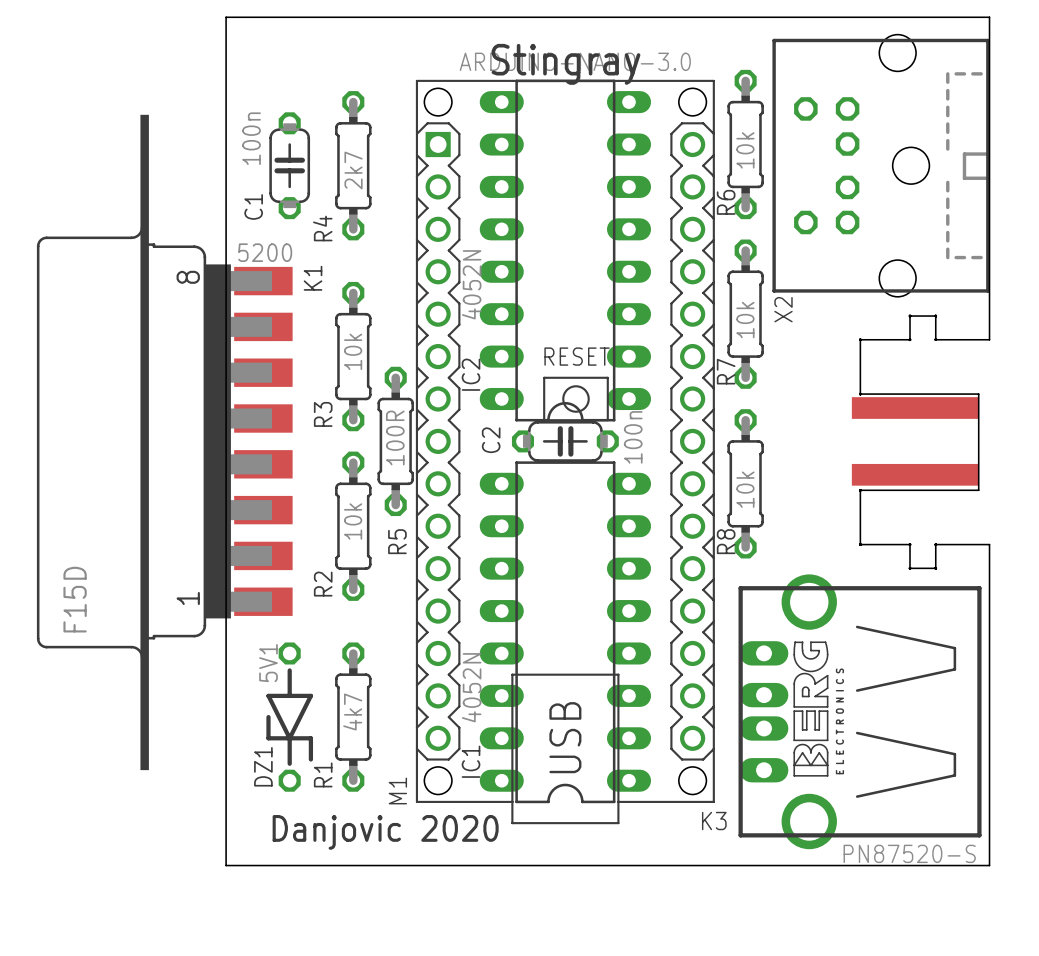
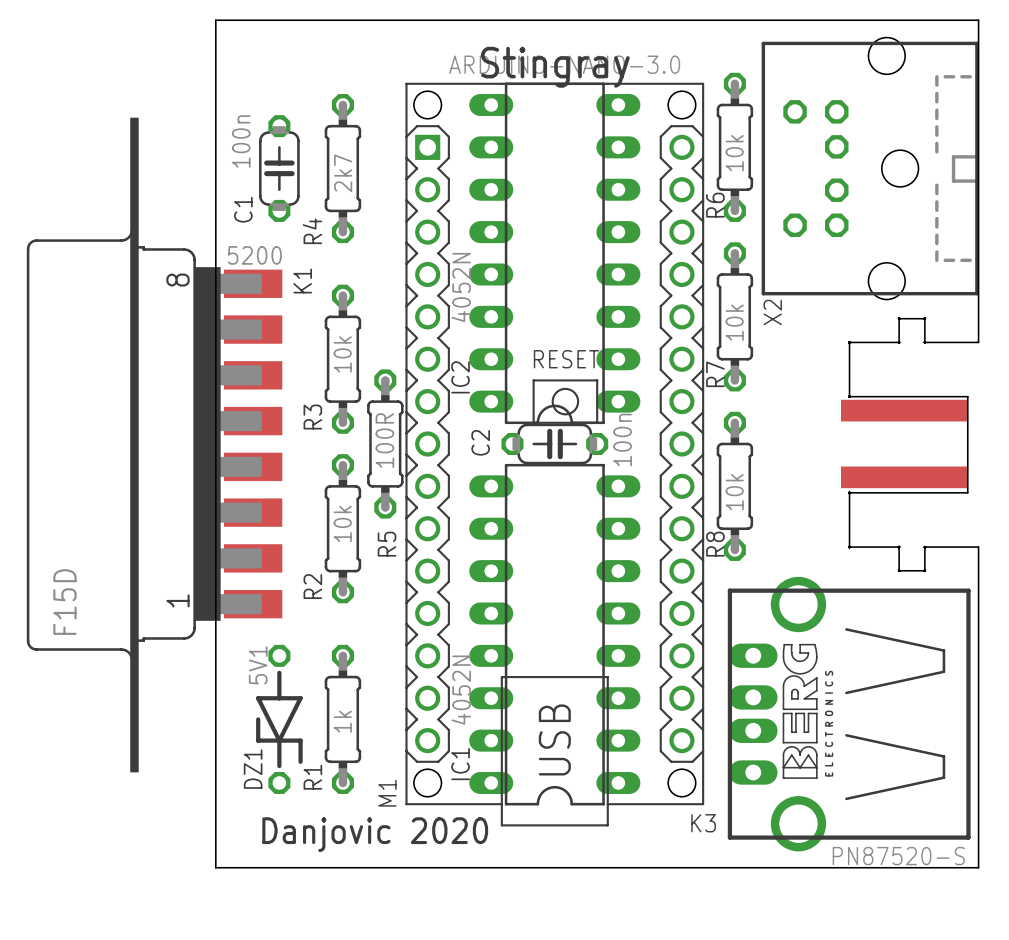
R1 value: 4k7 (352, 711) -> 1k (342, 721)

